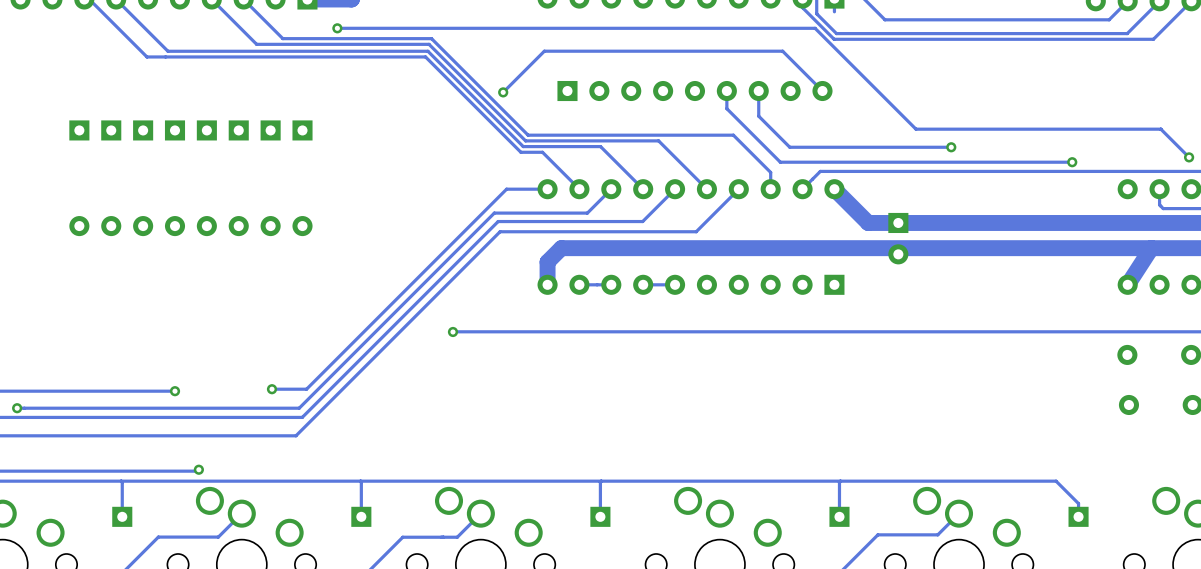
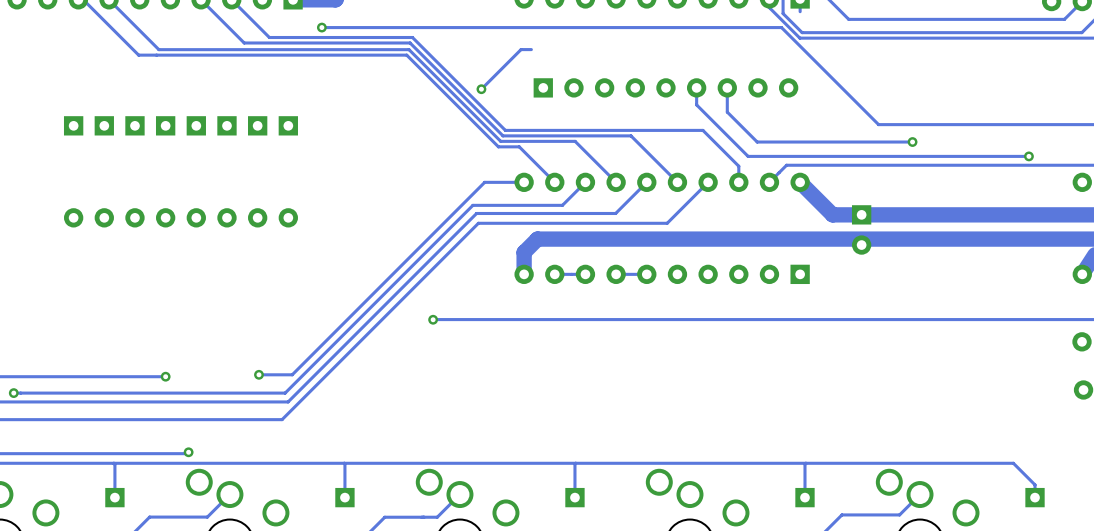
track: (555, 51) (782, 51) (822, 91) -> none

